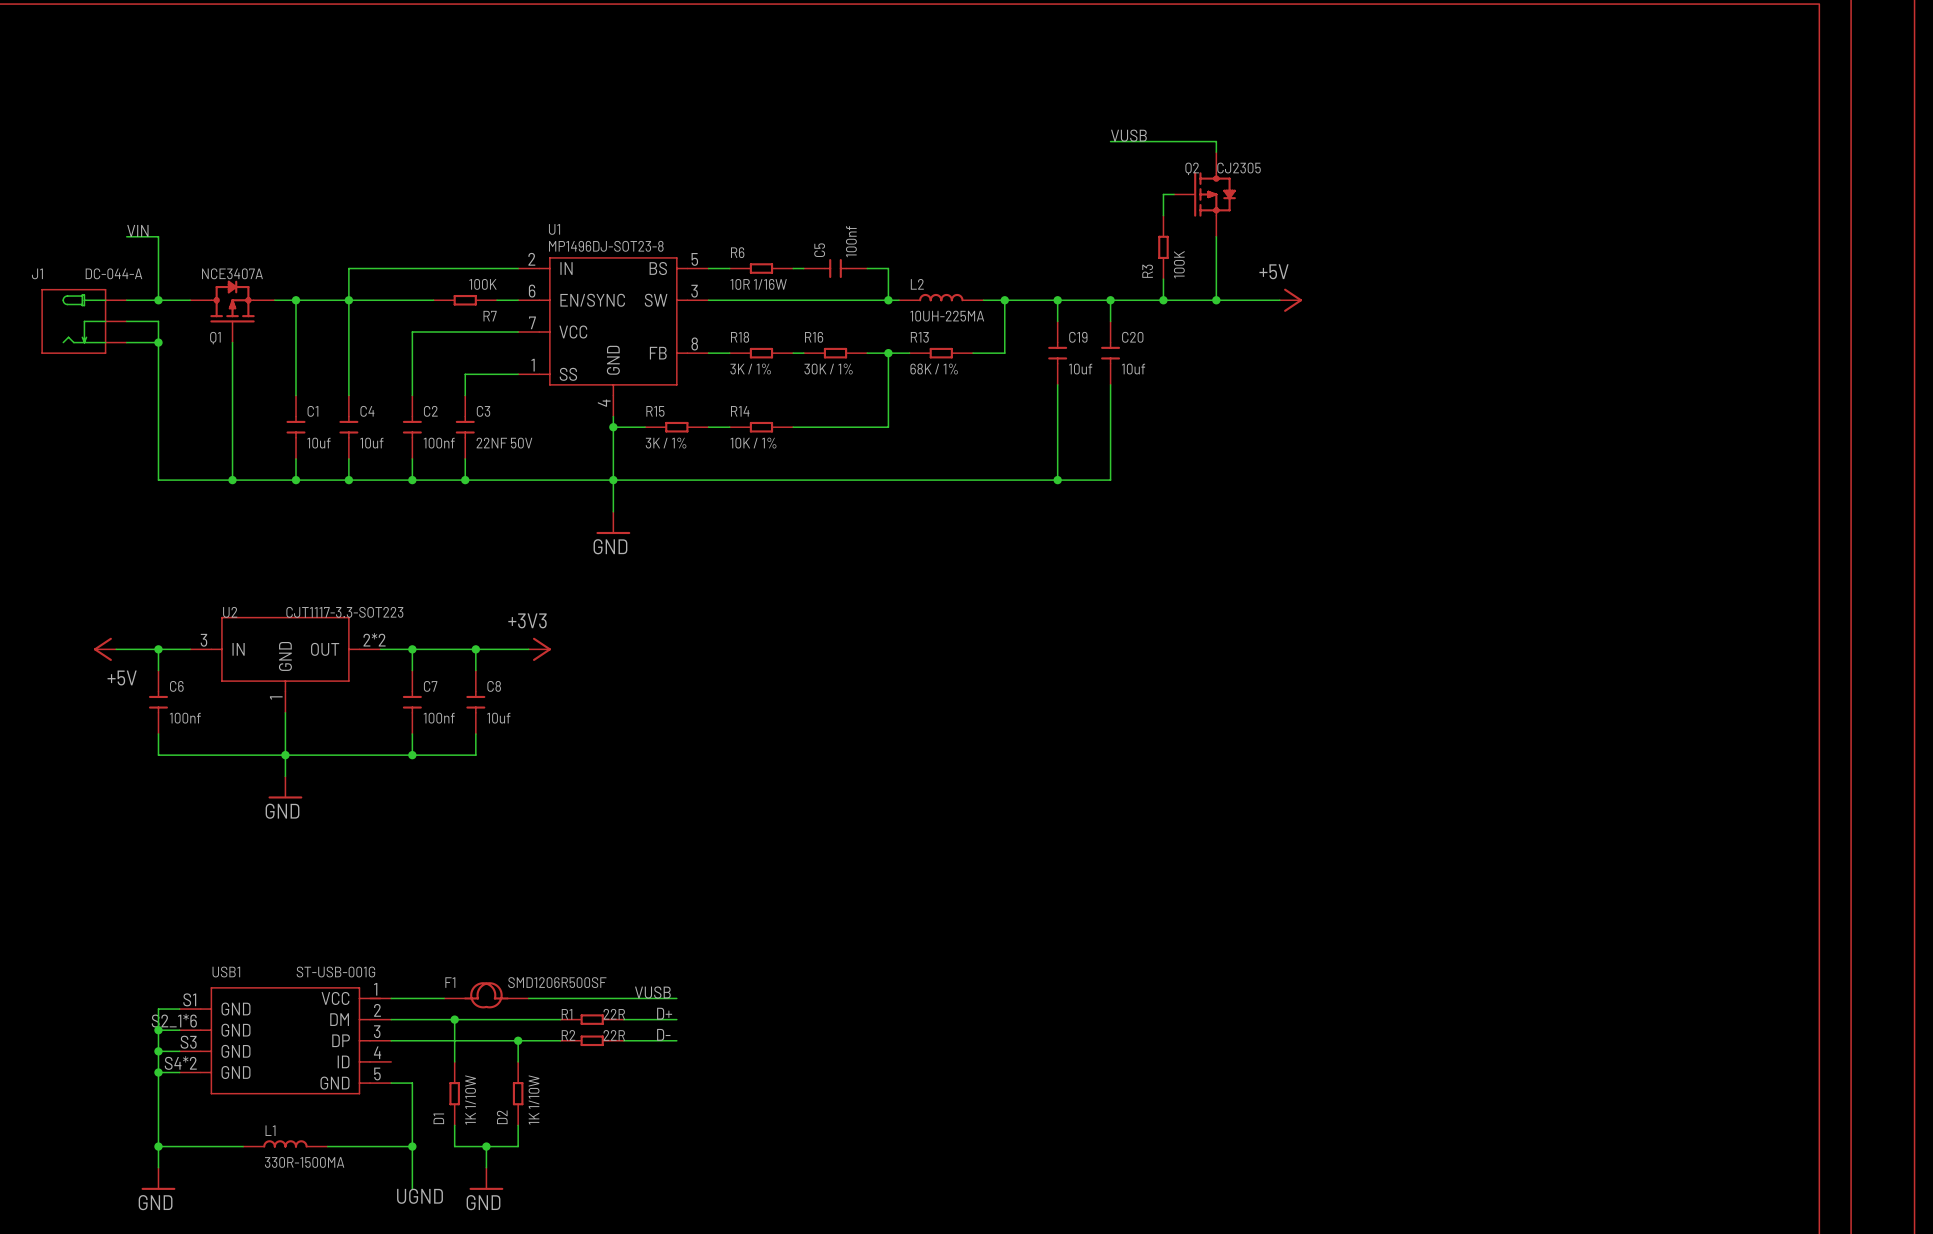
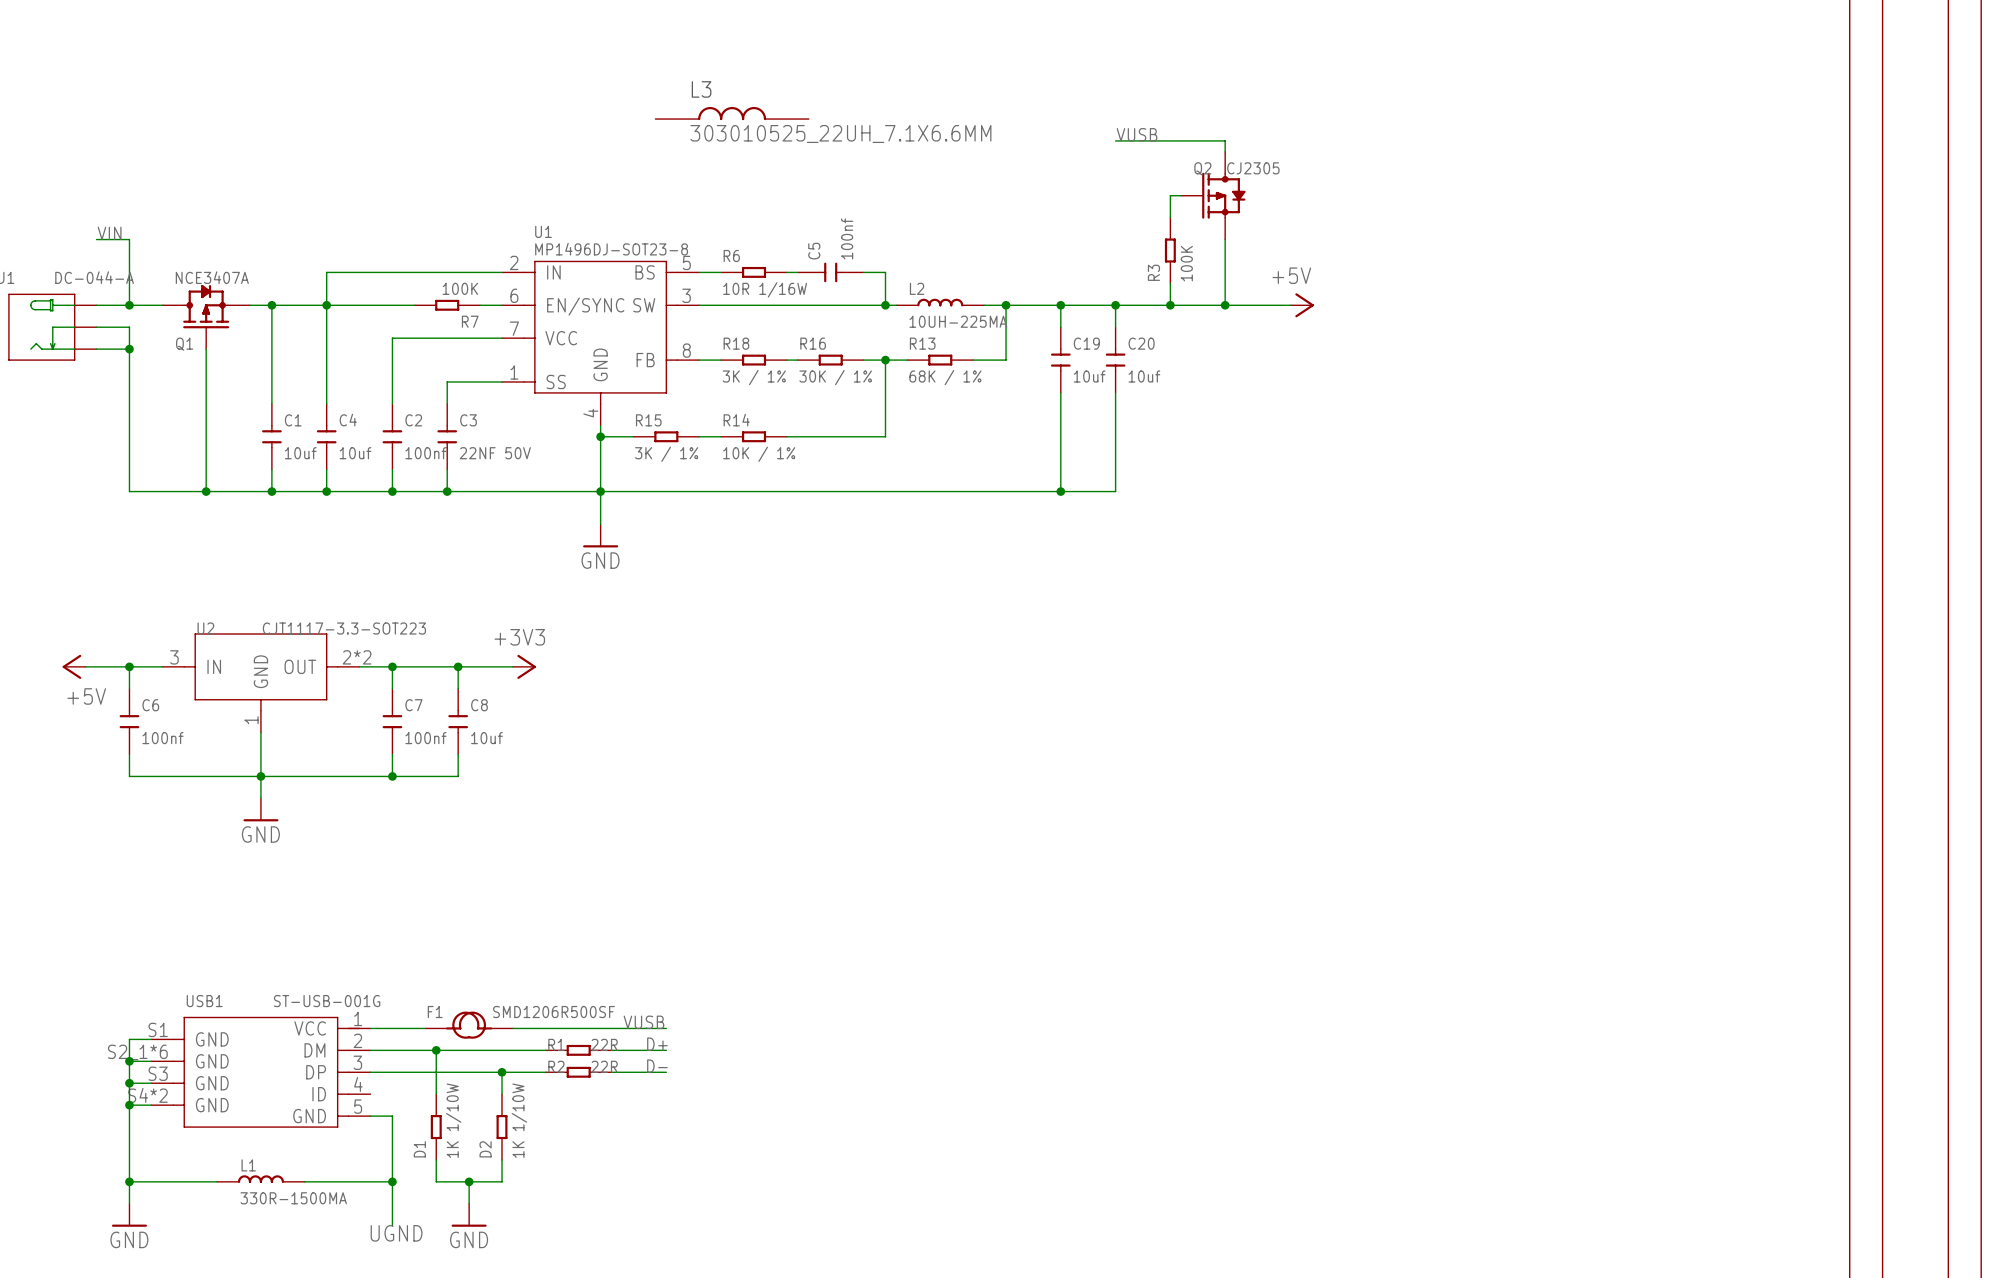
L3: none -> 303010525_22UH_7.1X6.6MM (732, 113)

